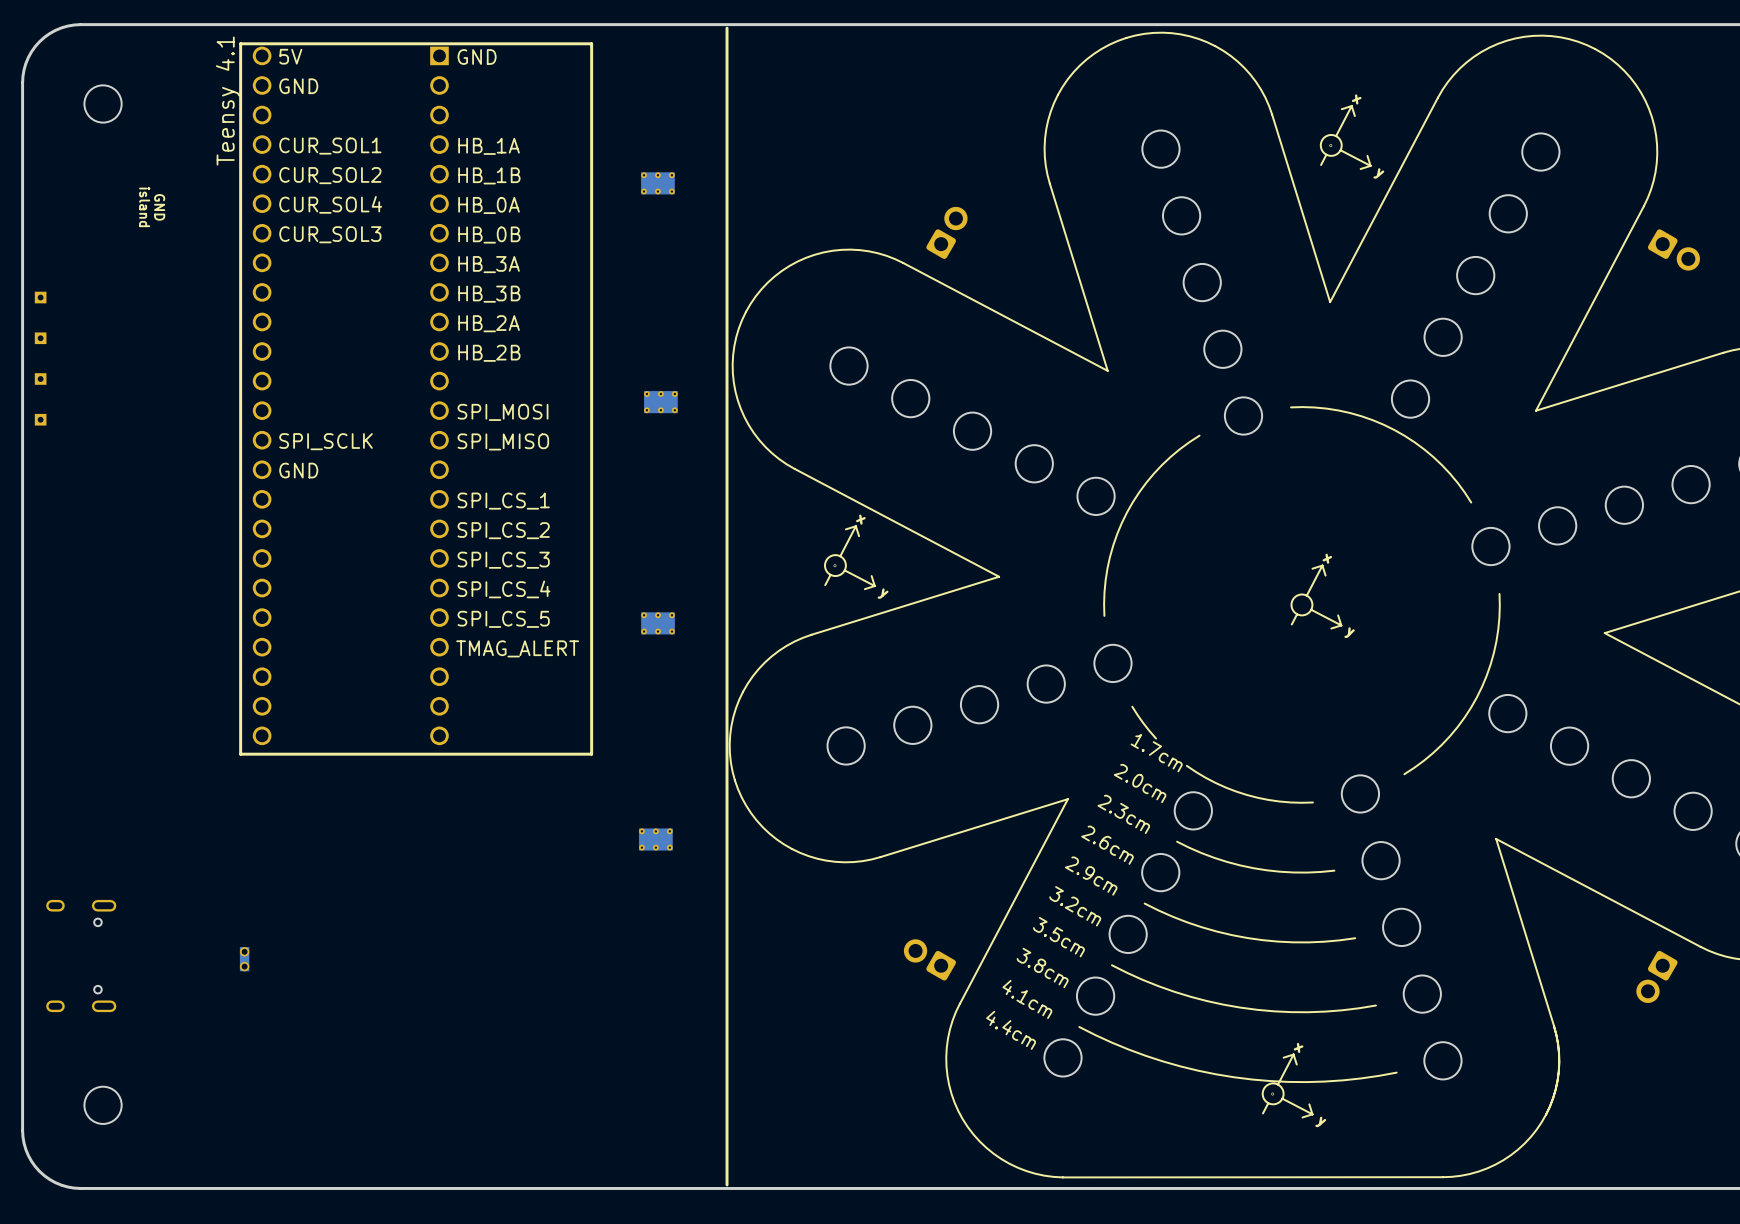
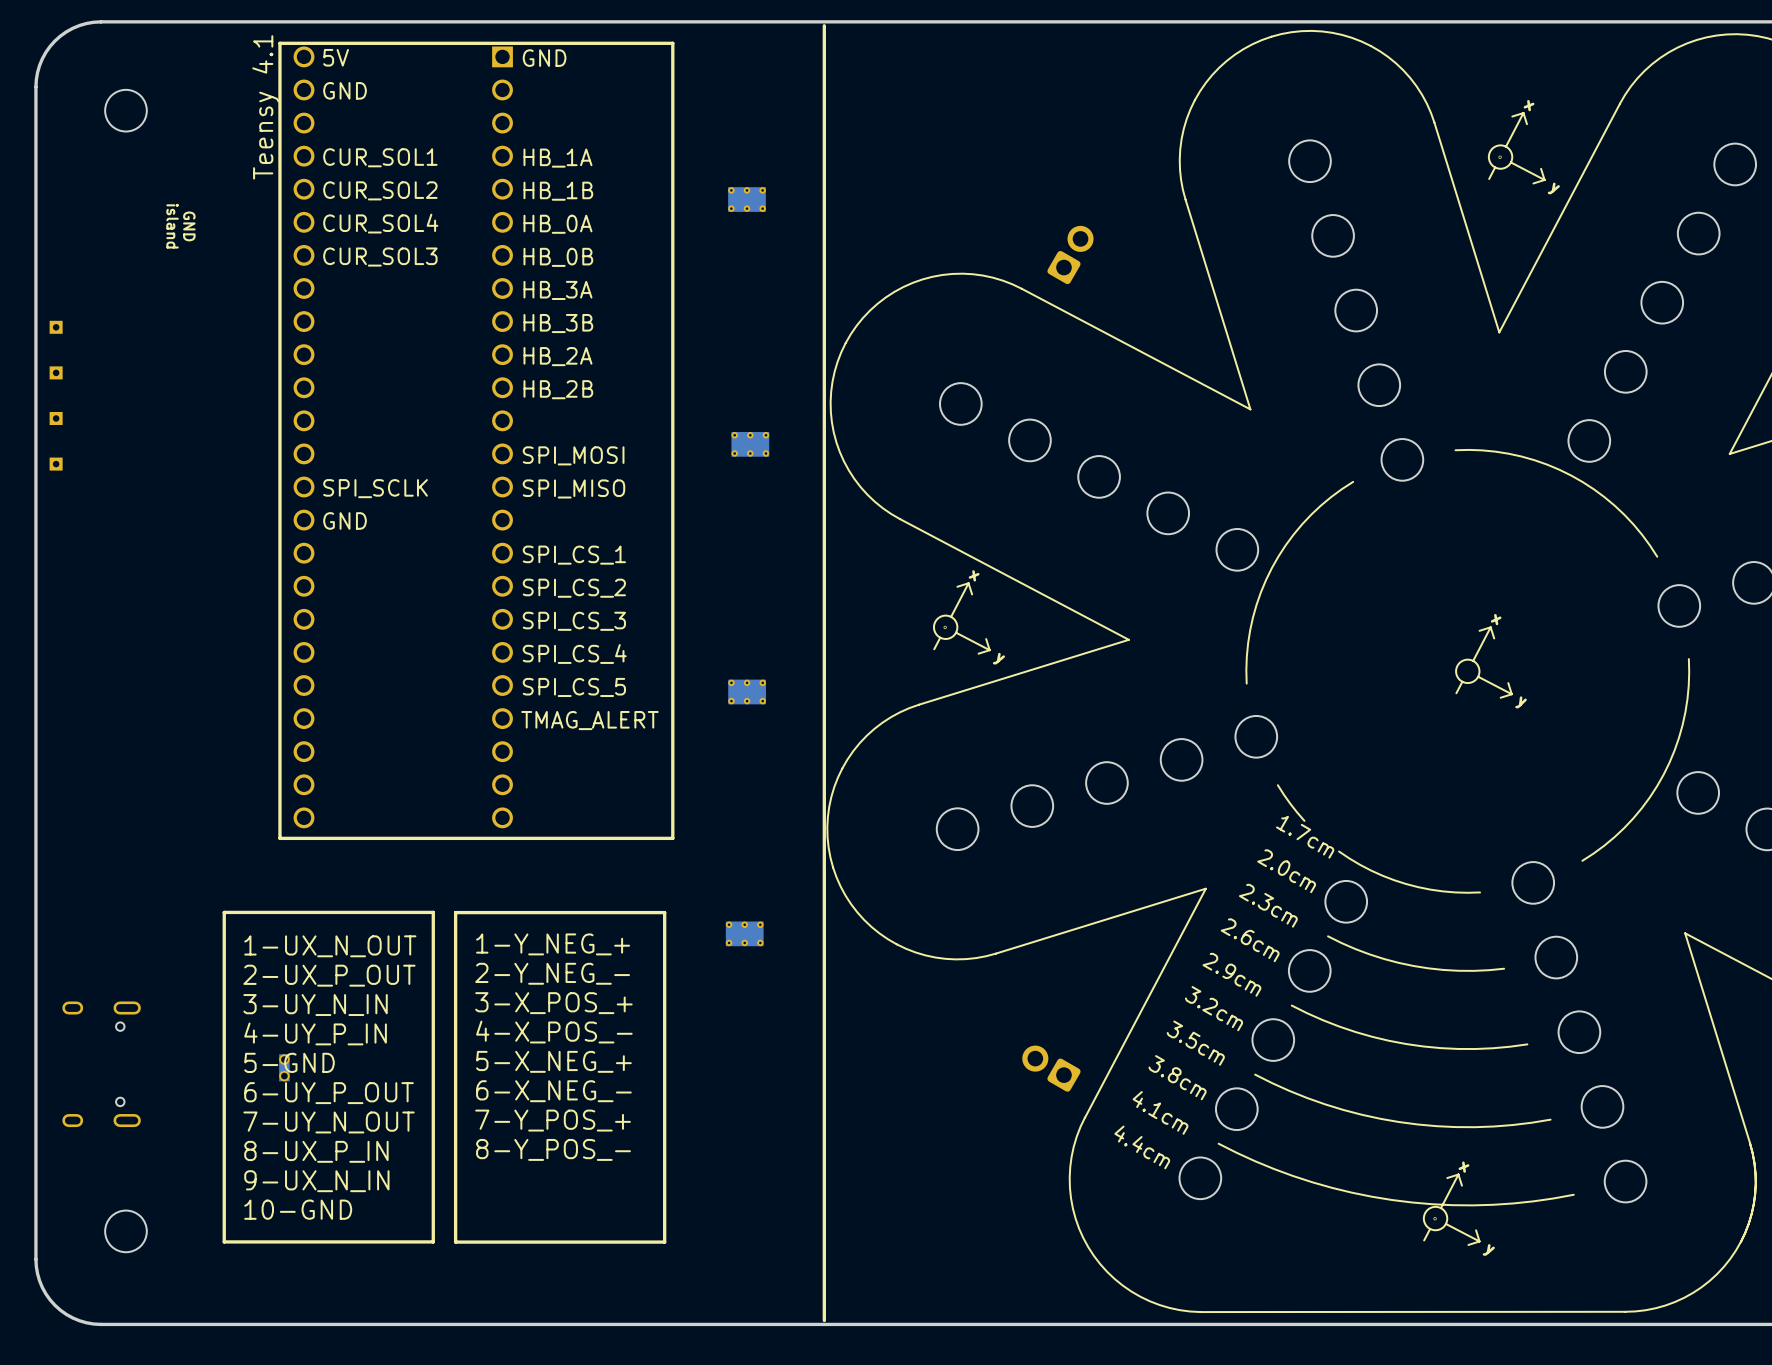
line: none -> (433, 912) (224, 912) (224, 1241) (433, 1241) (433, 912)
line: none -> (664, 912) (455, 912) (455, 1242) (664, 1242) (664, 912)
text: none -> 1-Y_NEG_+ (553, 944)
text: none -> 1-UX_N_OUT (330, 946)
text: none -> 2-Y_NEG_- (552, 973)
text: none -> 2-UX_P_OUT (329, 975)
text: none -> 3-X_POS_+ (553, 1003)
text: none -> 3-UY_N_IN (315, 1005)
text: none -> 4-X_POS_- (554, 1032)
text: none -> 4-UY_P_IN (315, 1033)
text: none -> 5-X_NEG_+ (553, 1061)
text: none -> 5-GND (289, 1062)
text: none -> 6-X_NEG_- (553, 1091)
text: none -> 6-UY_P_OUT (329, 1093)
text: none -> 7-Y_POS_+ (553, 1120)
text: none -> 7-UY_N_OUT (329, 1122)
text: none -> 8-Y_POS_- (553, 1149)
text: none -> 8-UX_P_IN (316, 1151)
text: none -> 9-UX_N_IN (316, 1181)
text: none -> 10-GND (298, 1209)

